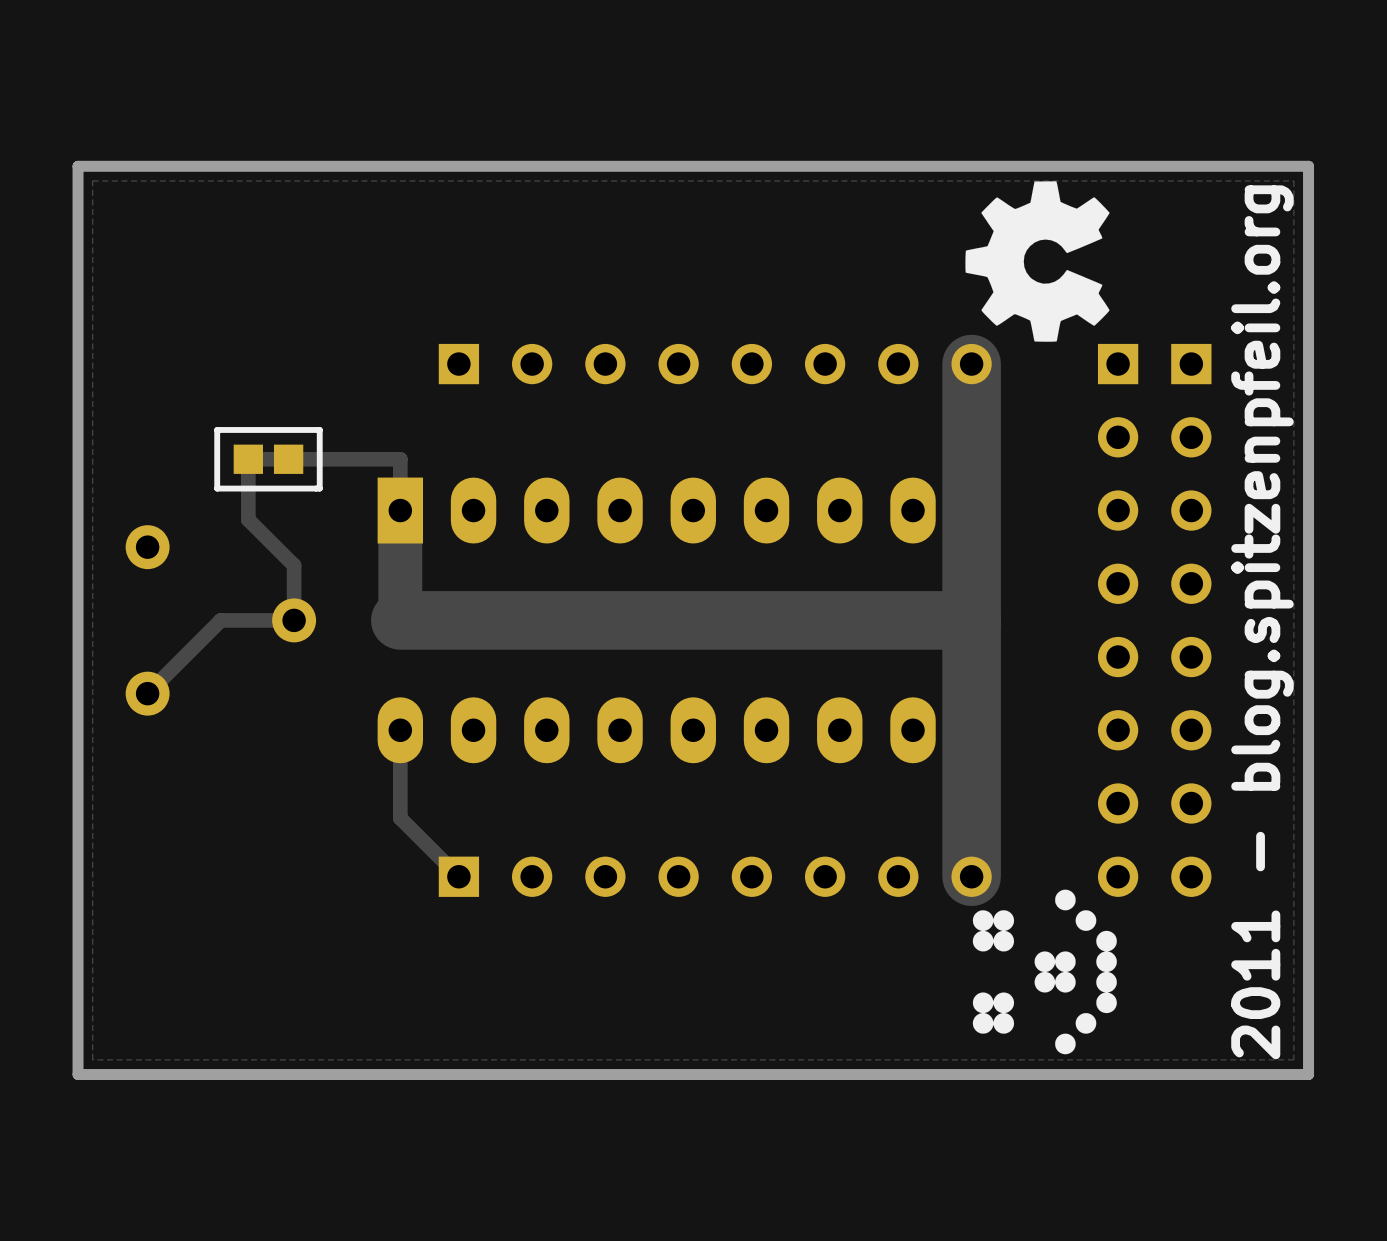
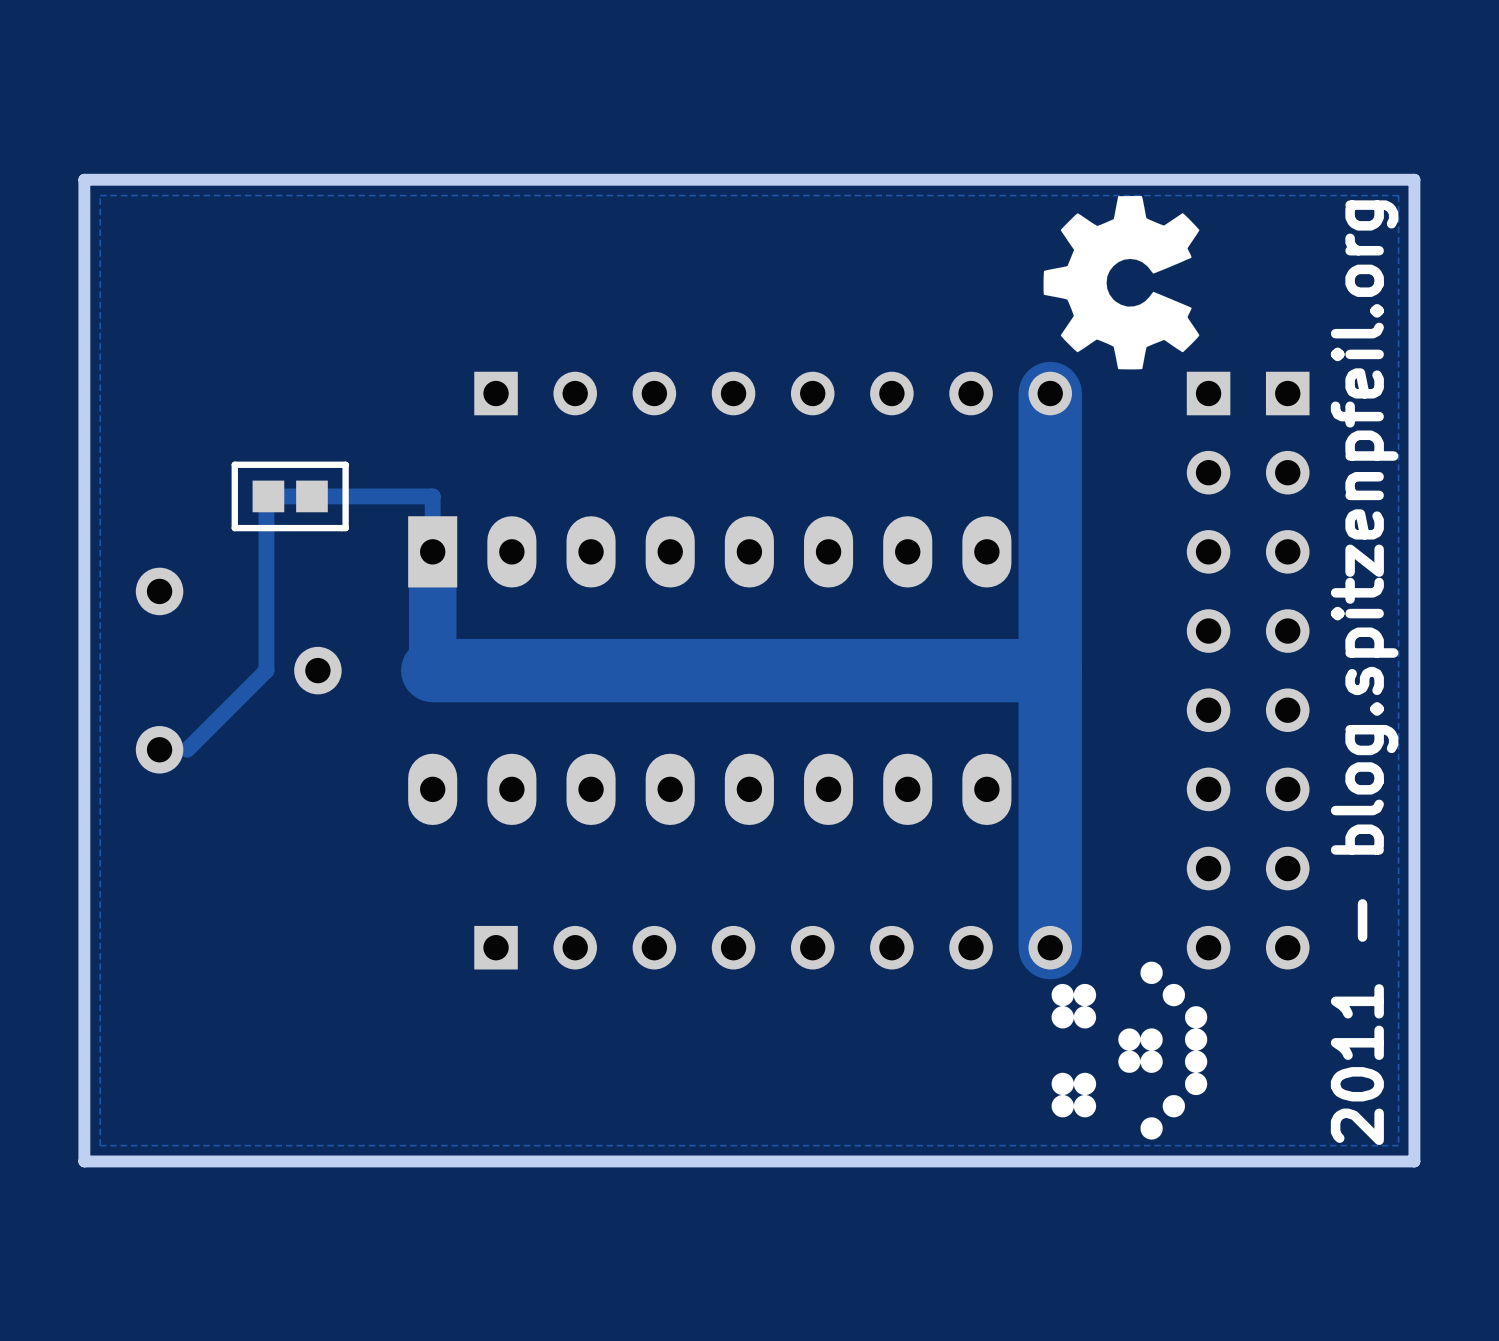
track: (248, 459) (248, 519) (294, 565) (294, 620) (220, 620) (147, 693) -> none
track: none -> (266, 498) (266, 670) (187, 749)
track: (400, 730) (400, 818) (458, 876) -> none

